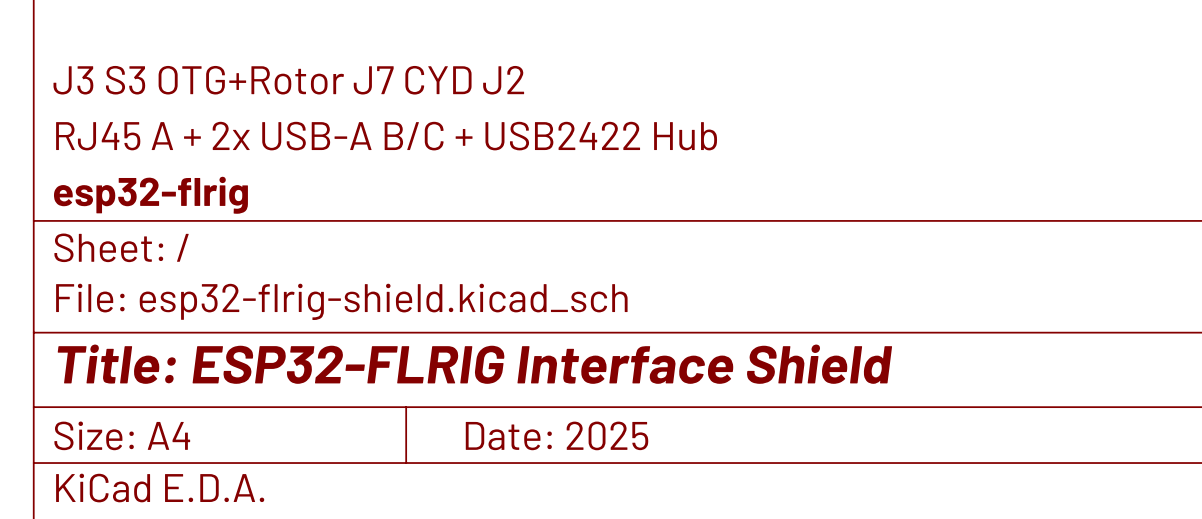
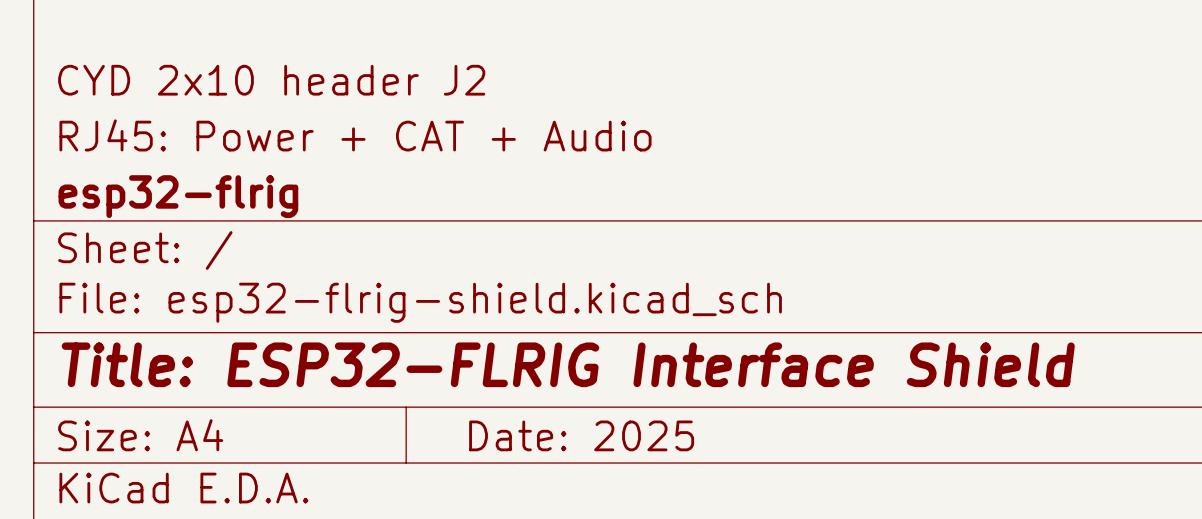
title block: J3 S3 OTG+Rotor J7 CYD J2 (288, 80) -> CYD 2x10 header J2 (271, 80)
title block: RJ45 A + 2x USB-A B/C + USB2422 Hub (386, 136) -> RJ45: Power + CAT + Audio (355, 135)

